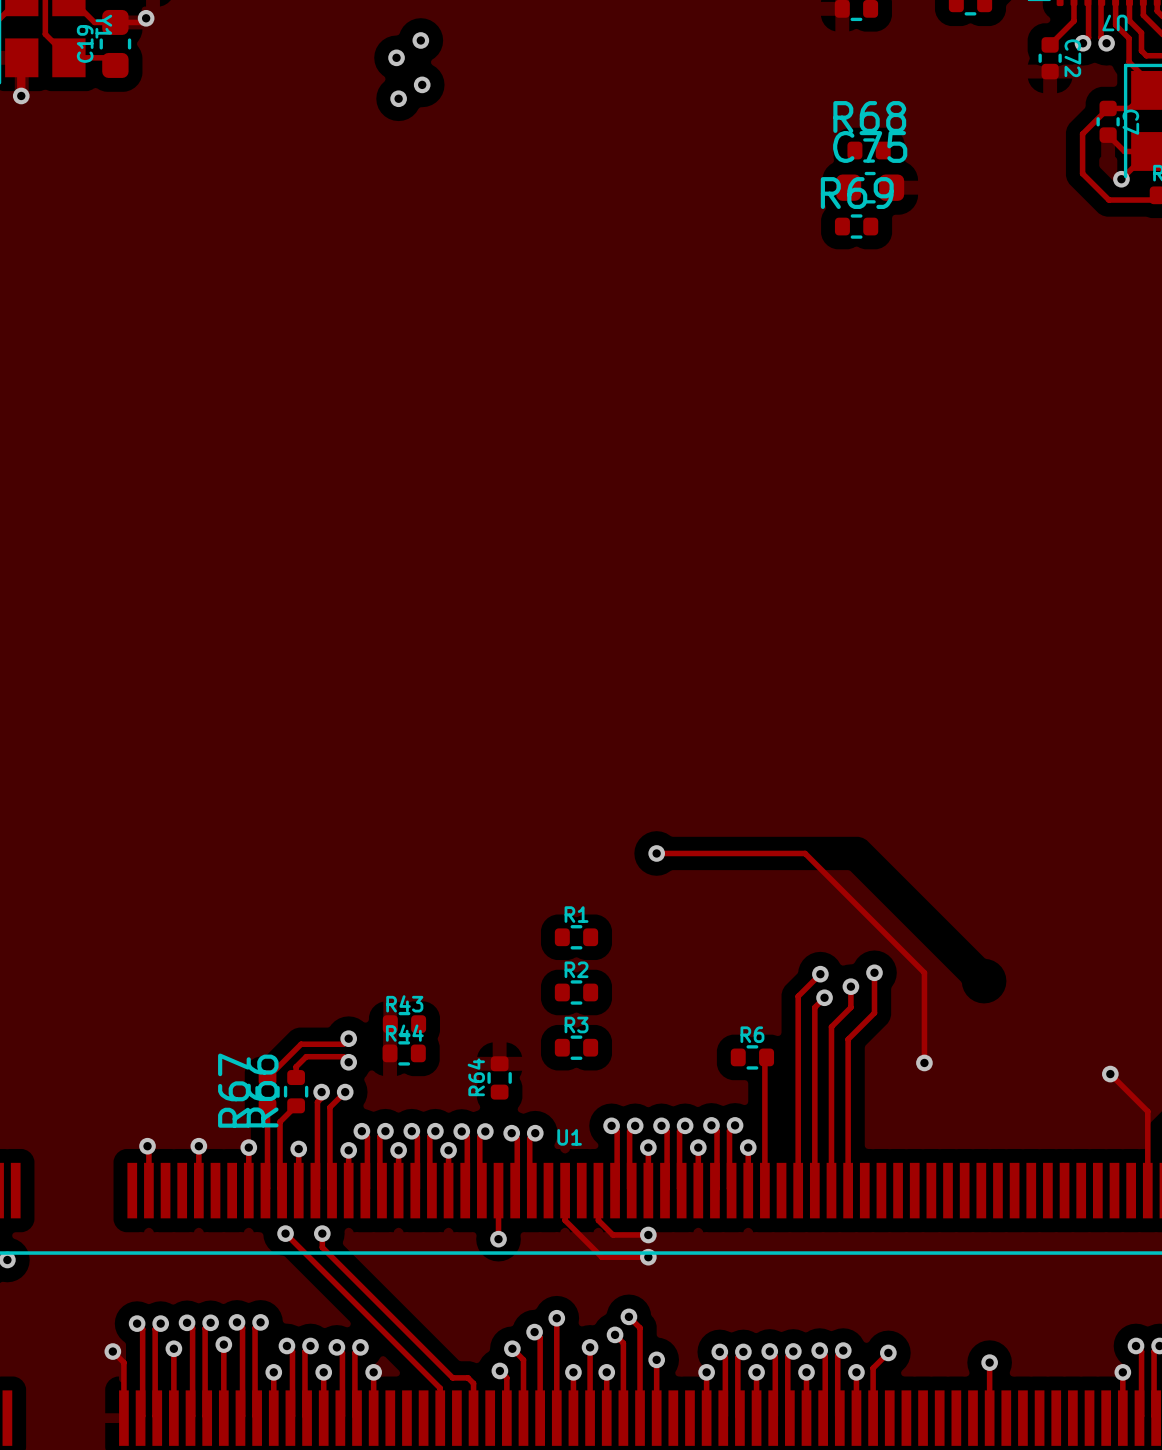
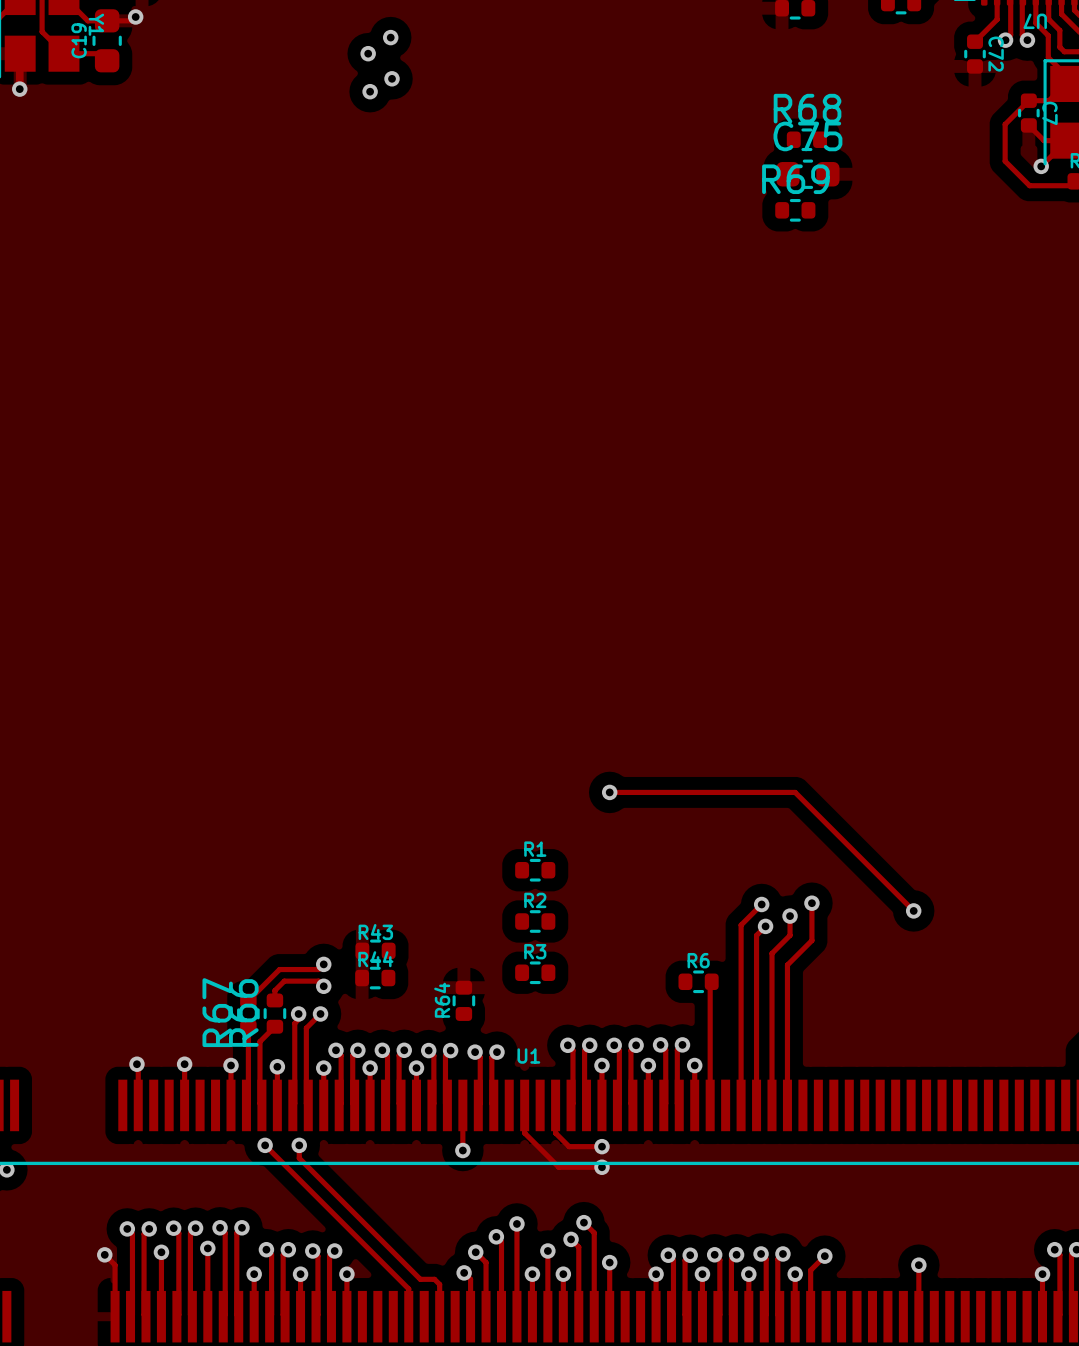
track: (805, 853) (924, 972) (924, 1062) -> (747, 792) (795, 792) (913, 910)
via: none -> (913, 910)
via: (924, 1062) -> none
track: (1110, 1074) (1147, 1111) (1147, 1190) -> none
via: (1110, 1074) -> none

